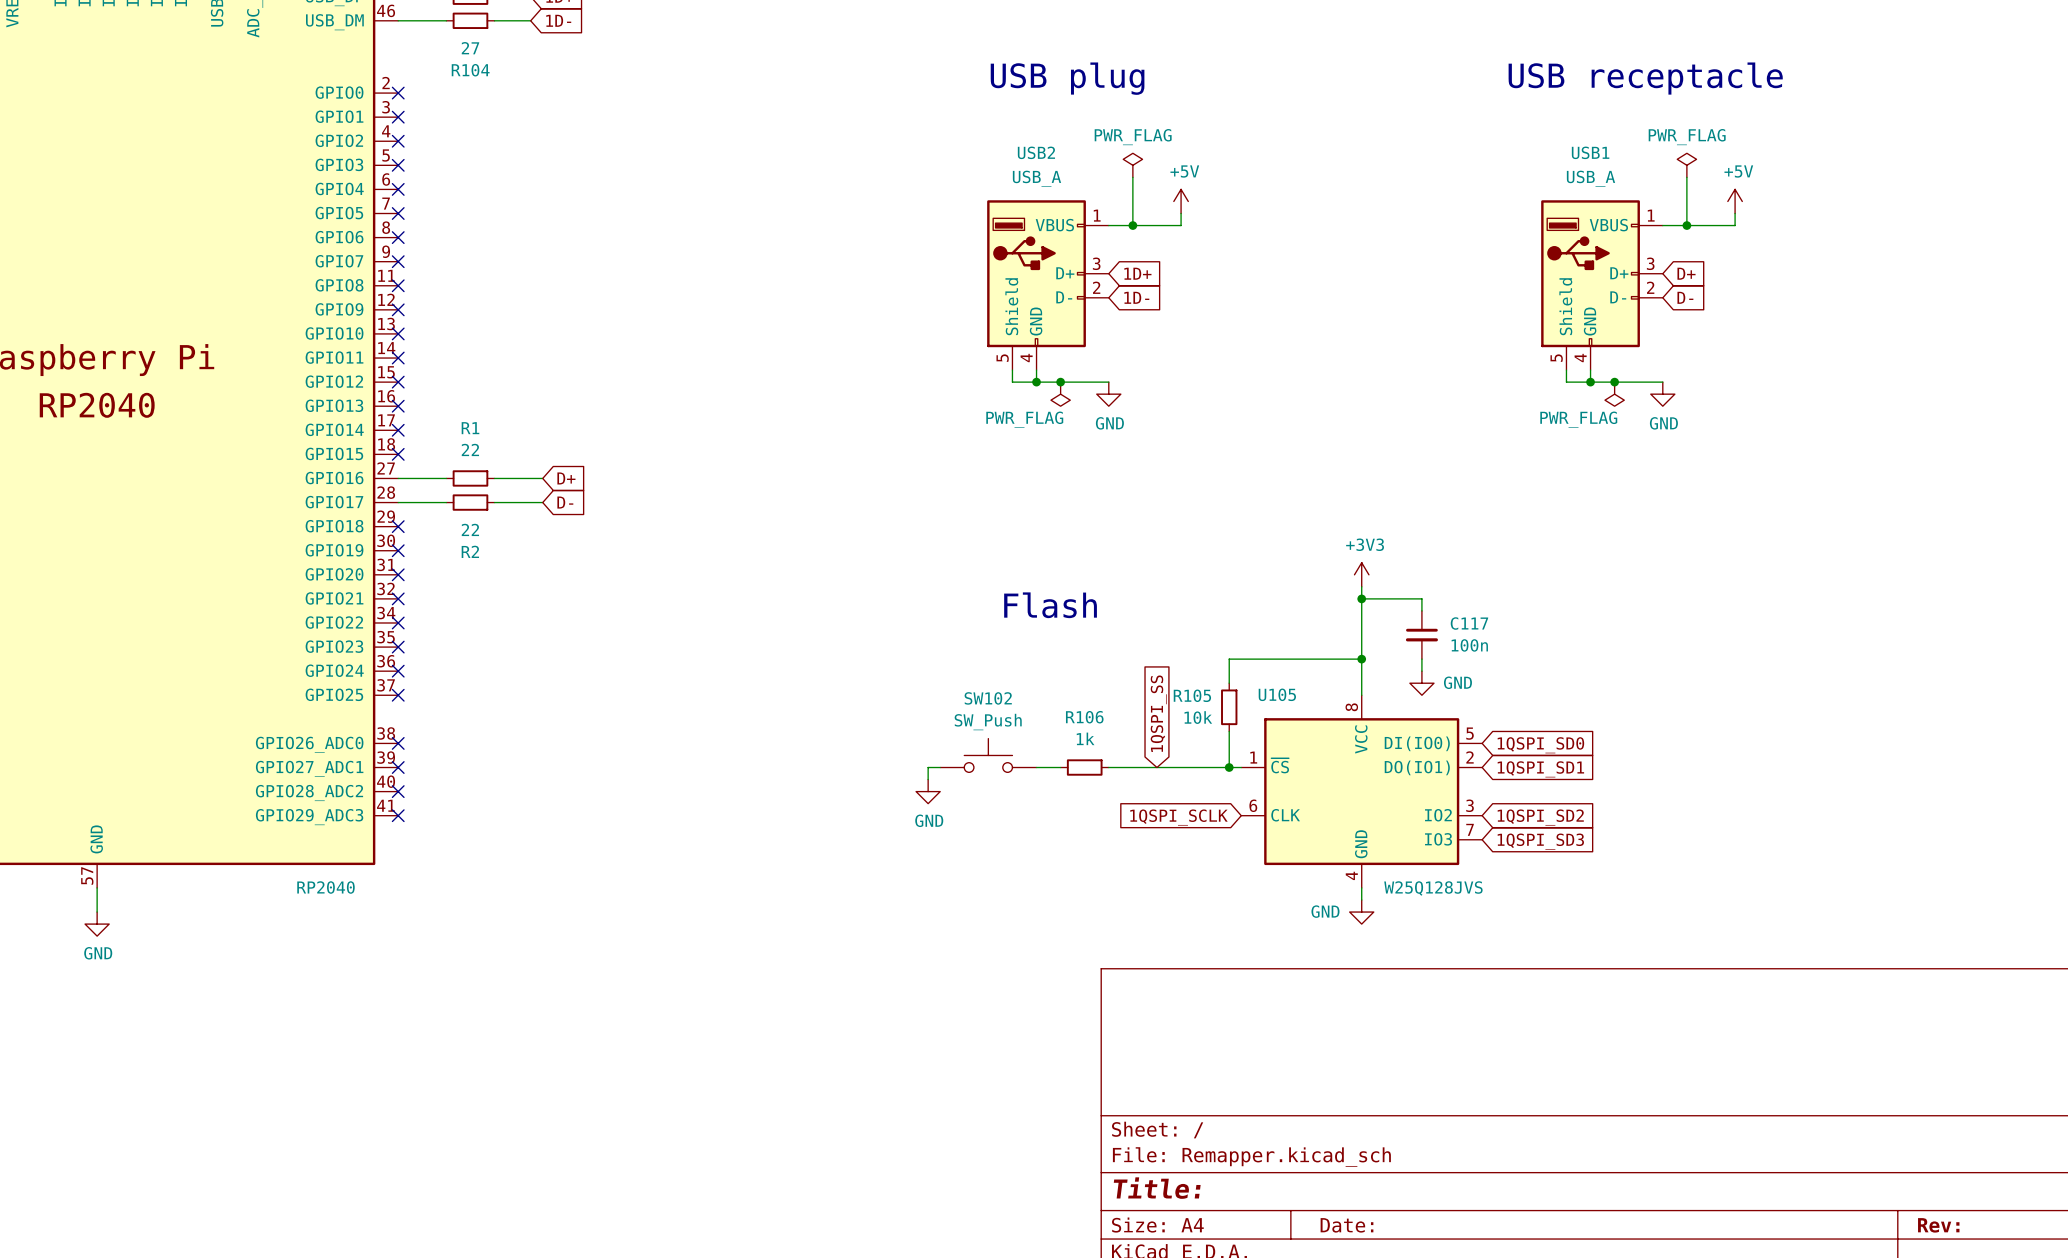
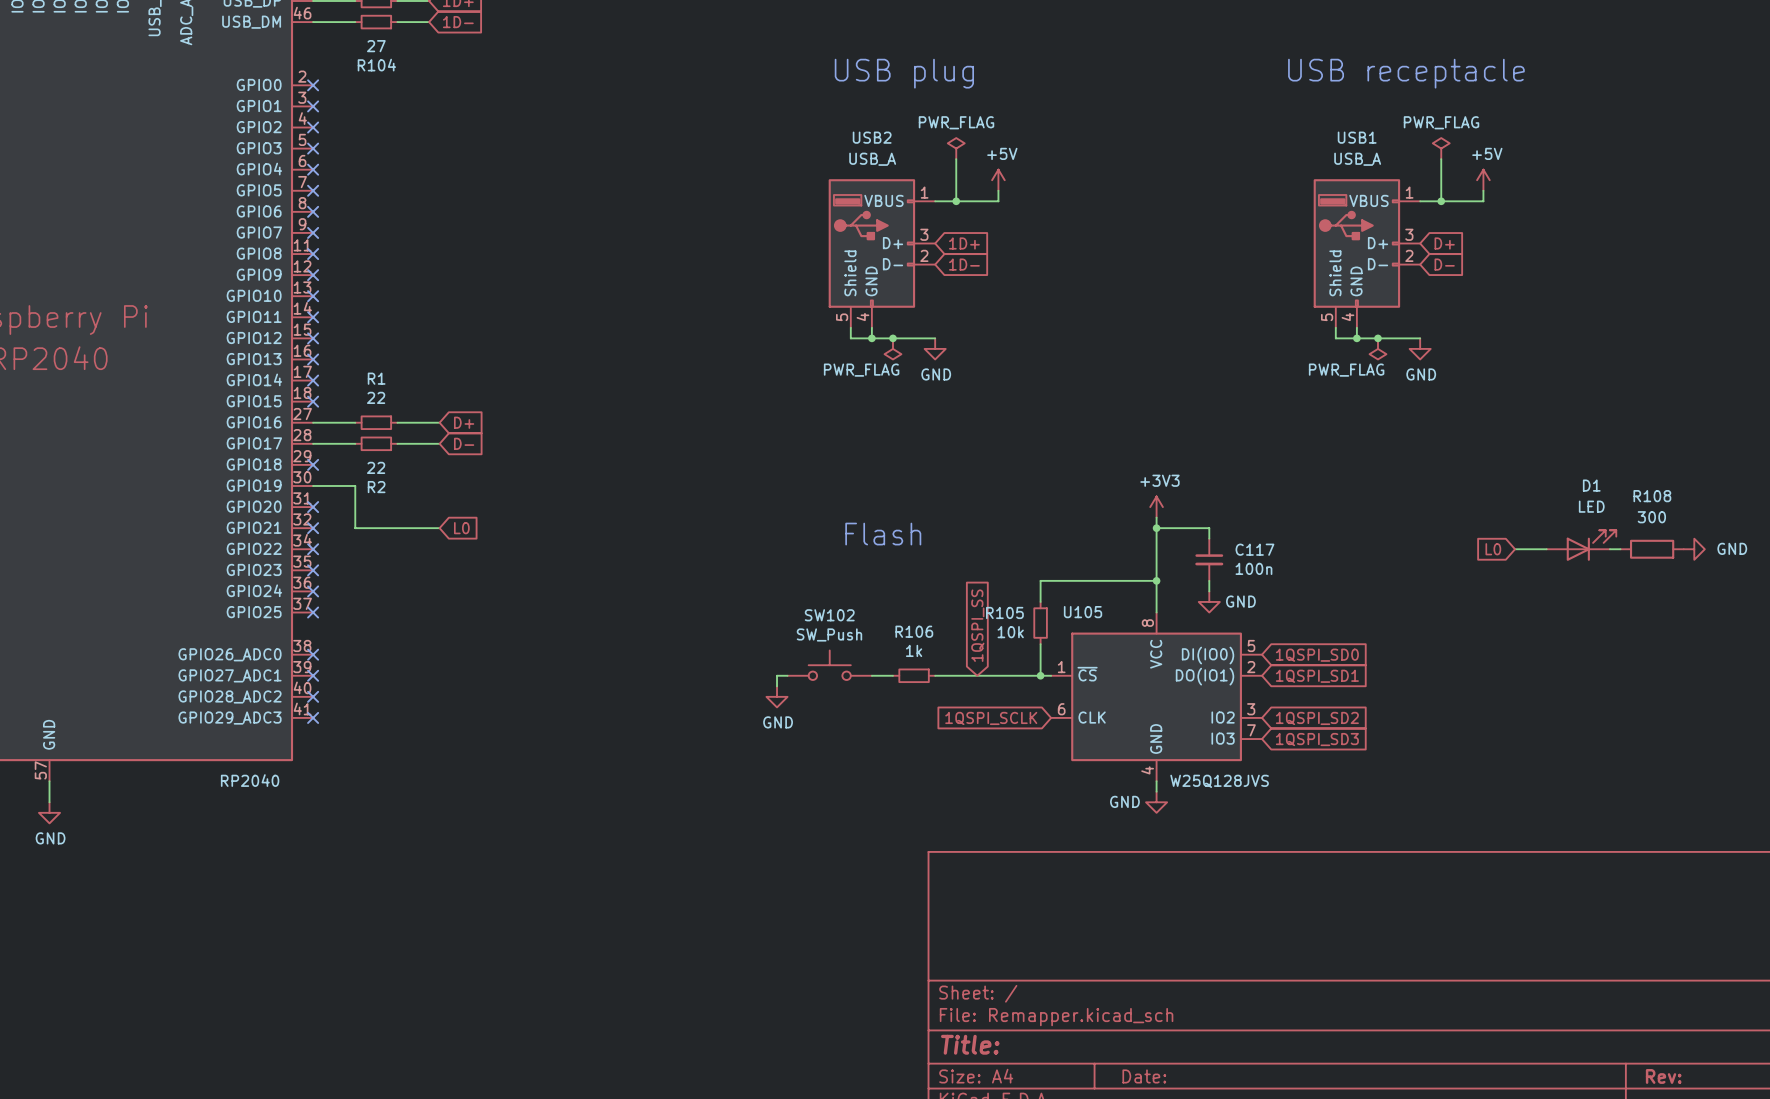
wire: none -> (313, 485) (355, 485) (355, 528) (439, 528)
no-connect mark: (398, 550) -> none
global label: none -> L0 (461, 528)
D1: none -> LED (1581, 545)
wire: none -> (1515, 549) (1546, 549)
wire: none -> (1609, 549) (1620, 549)
R108: none -> 300 (1652, 549)
power symbol: none -> GND (1694, 549)
global label: none -> L0 (1493, 549)

